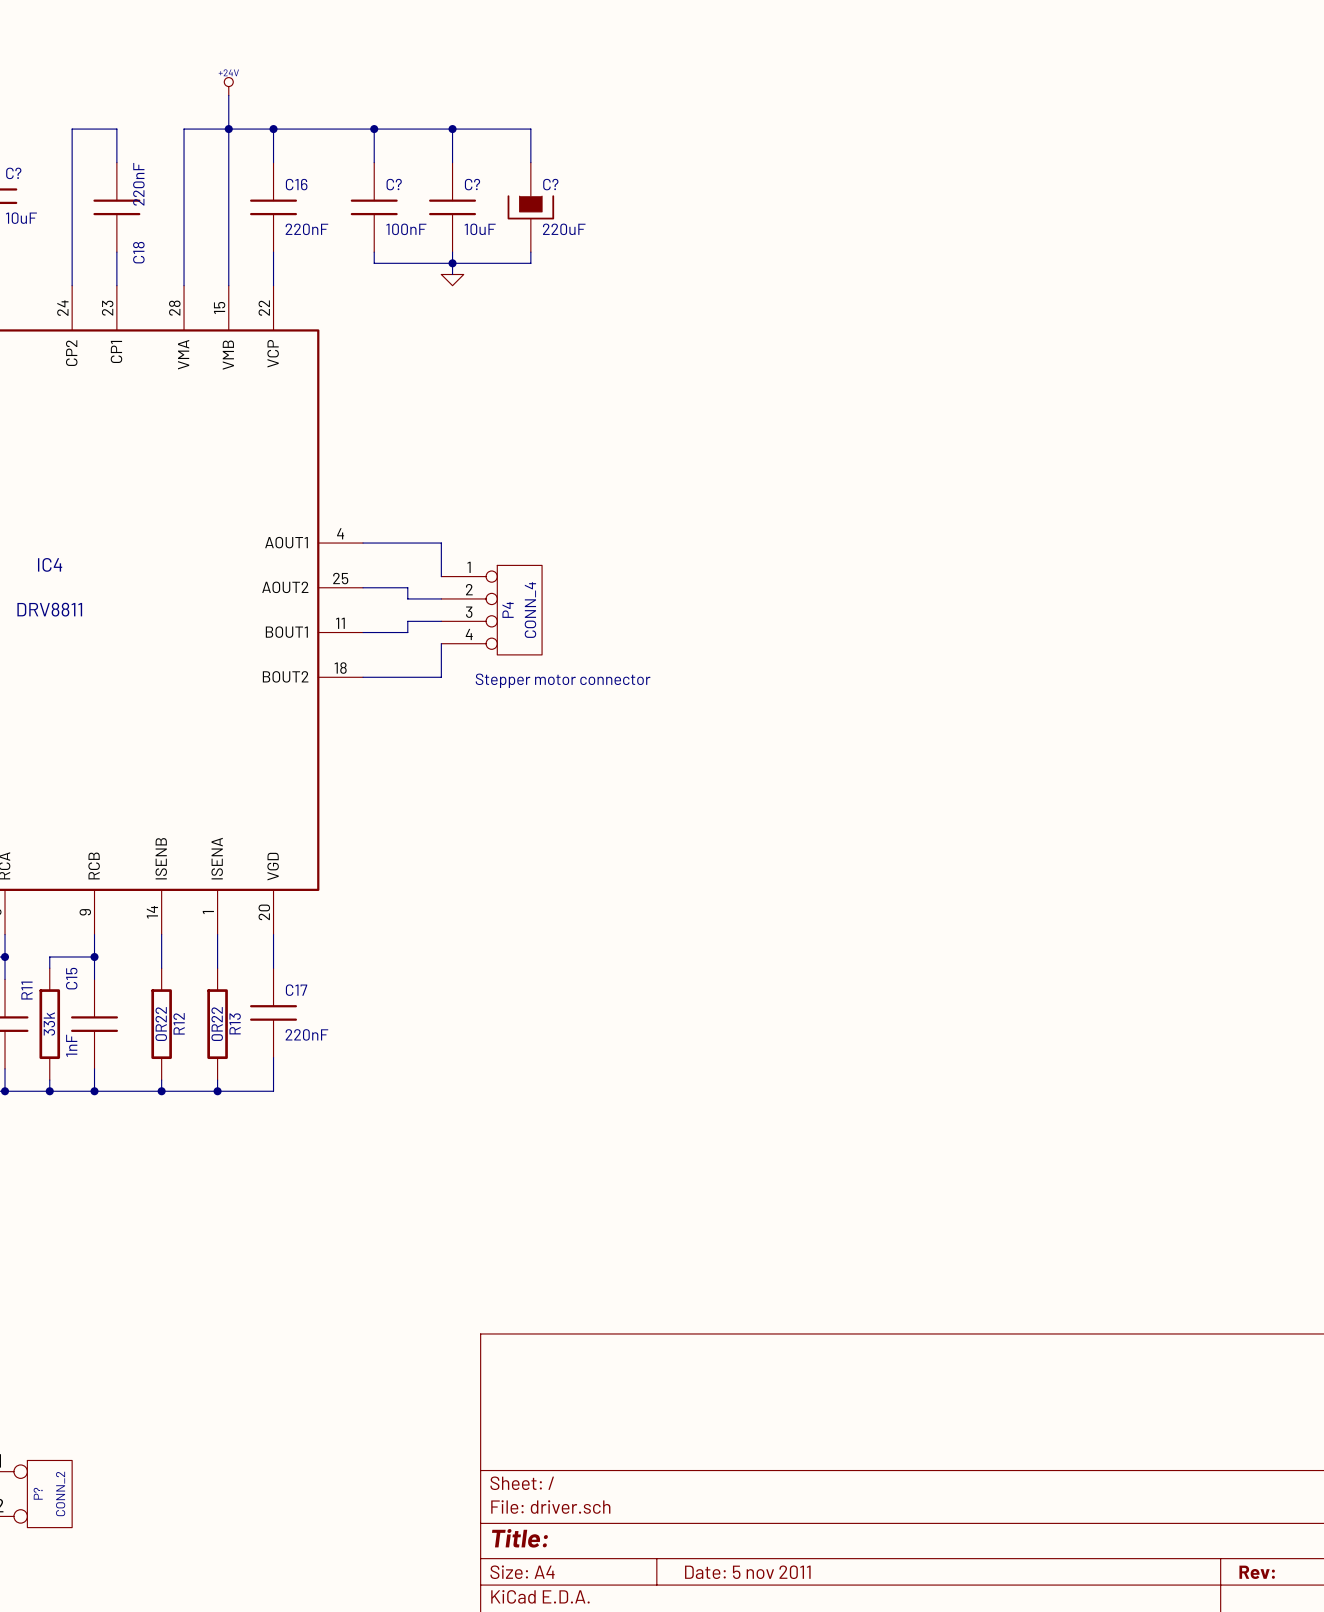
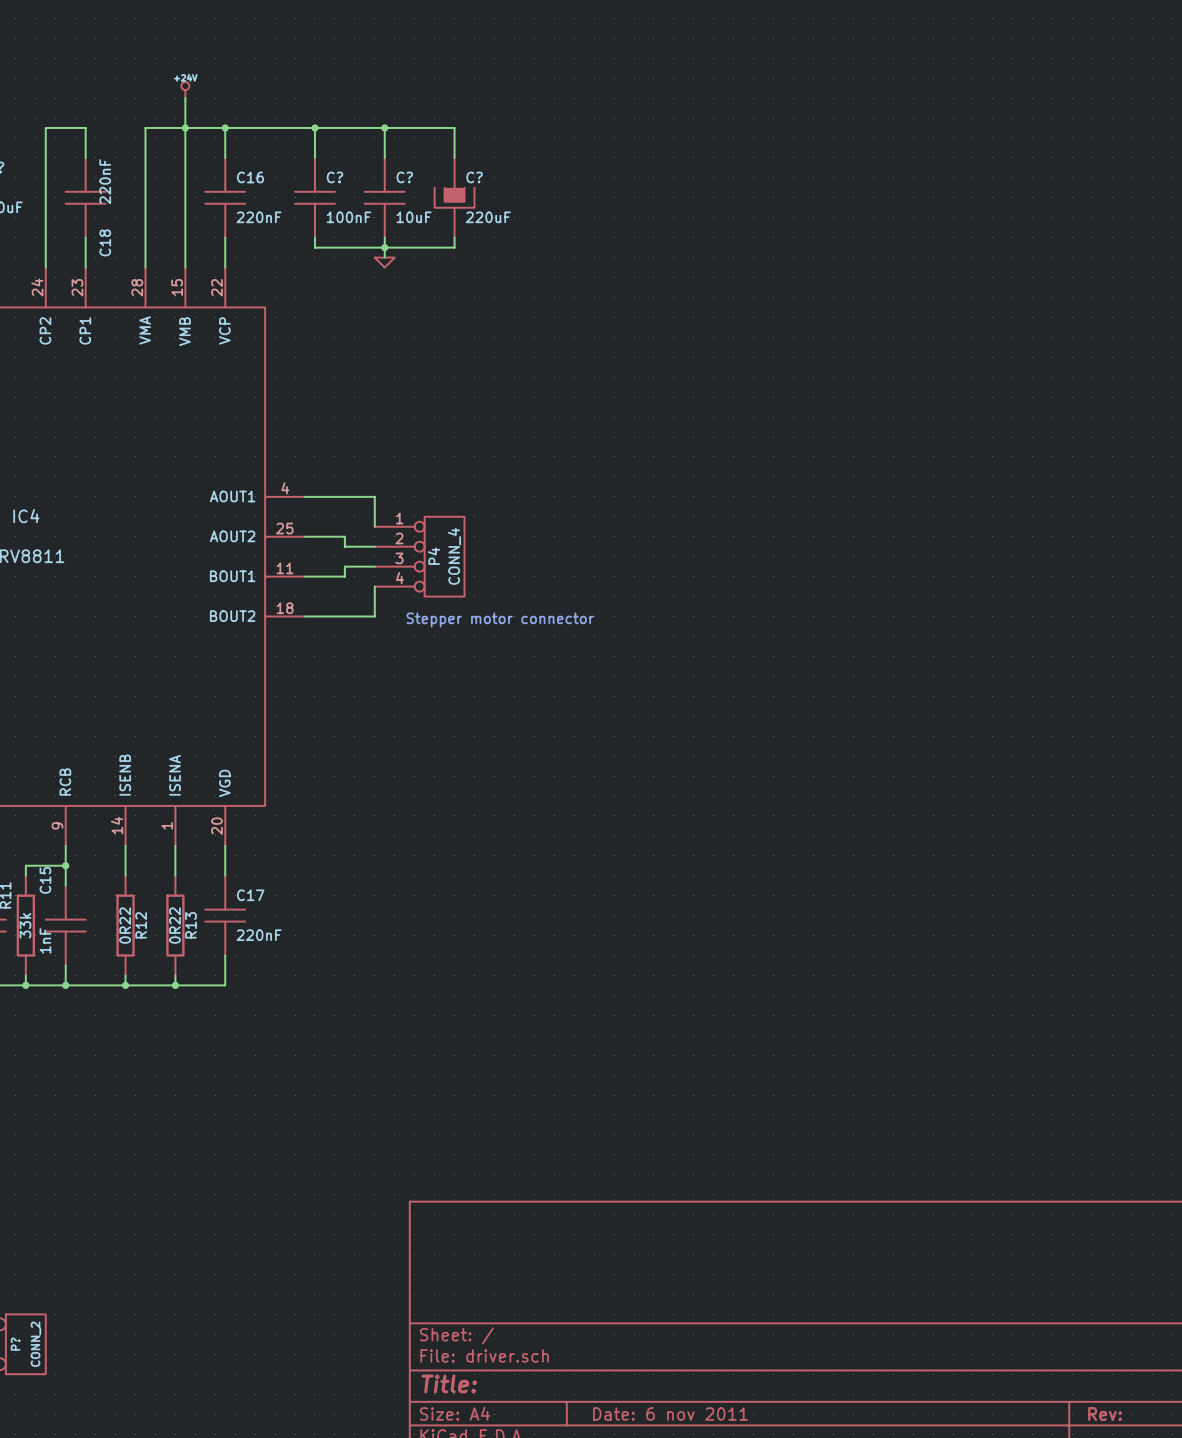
title block: Date: 5 nov 2011 (747, 1572) -> Date: 6 nov 2011 (670, 1413)

